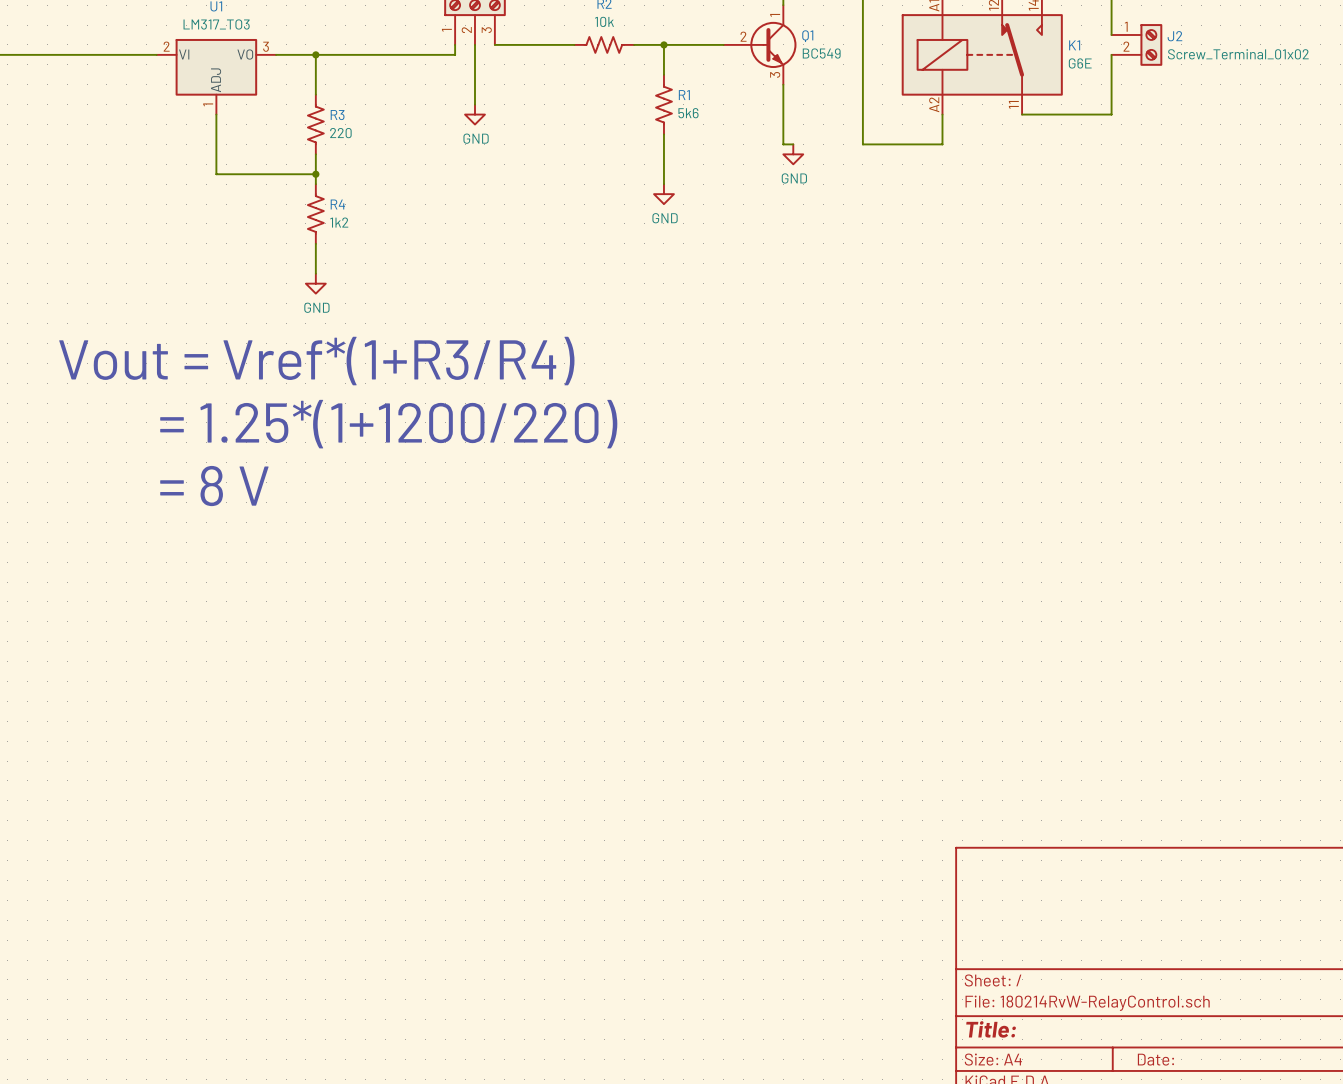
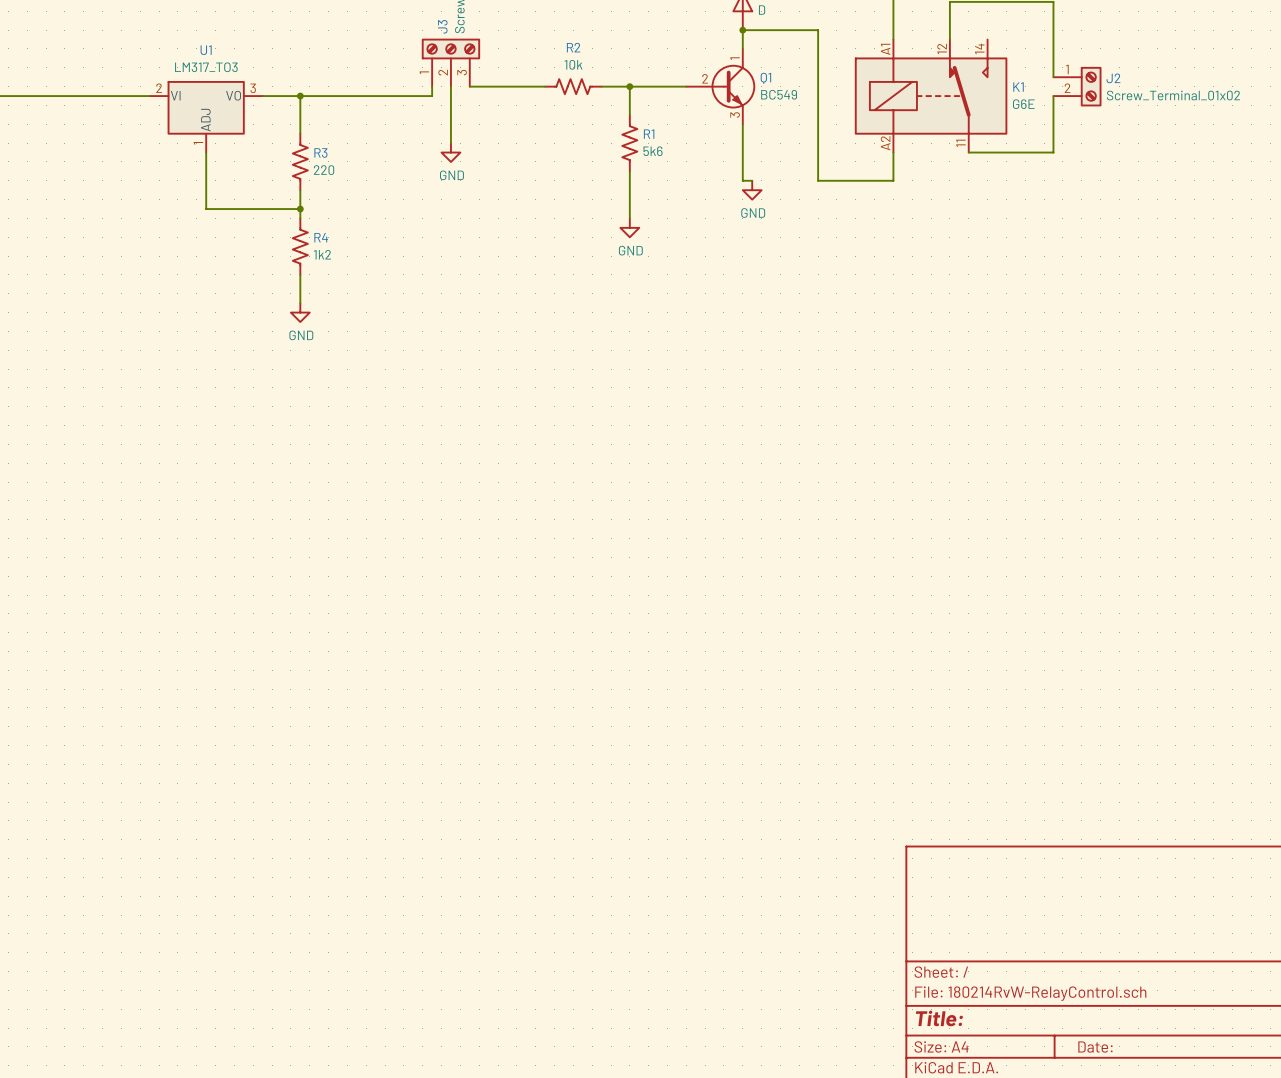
text: Vout = Vref*(1+R3/R4) (316, 361) -> none
text: = 1.25*(1+1200/220) (388, 424) -> none
text: = 8 V (214, 486) -> none

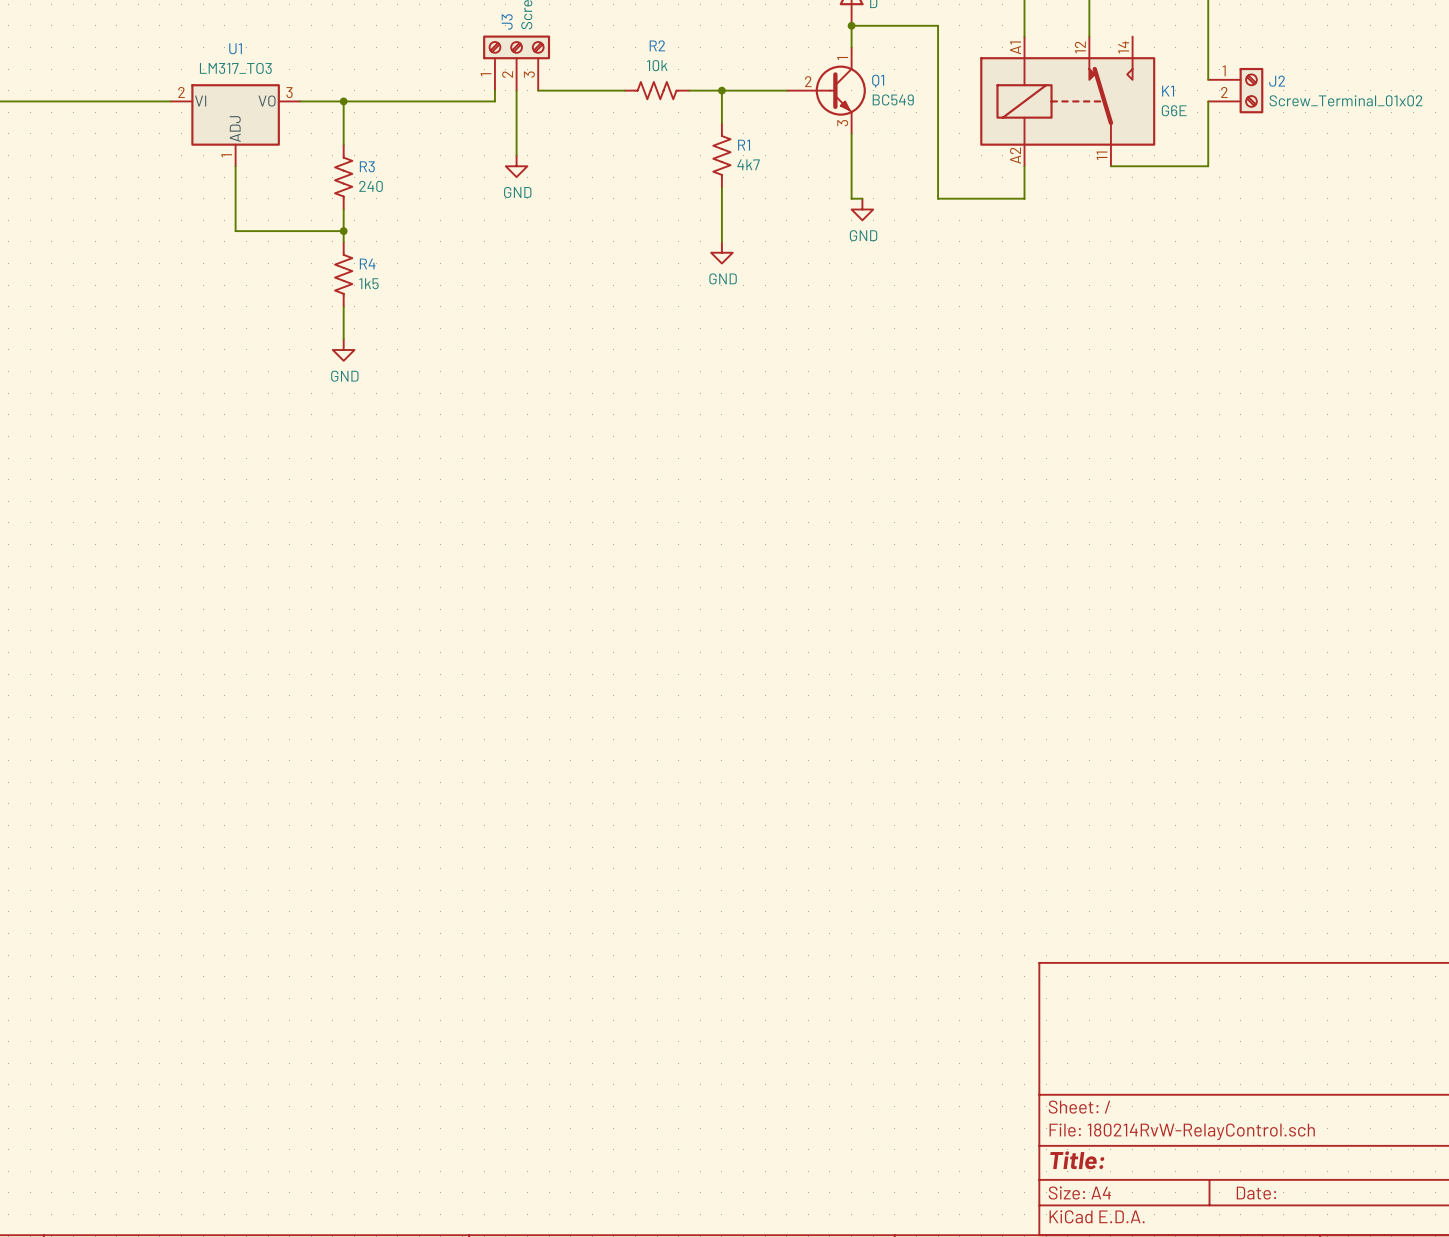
R1 value: 5k6 (653, 151) -> 4k7 (748, 164)
R3 value: 220 (324, 170) -> 240 (371, 186)
R4 value: 1k2 (322, 254) -> 1k5 (368, 283)

